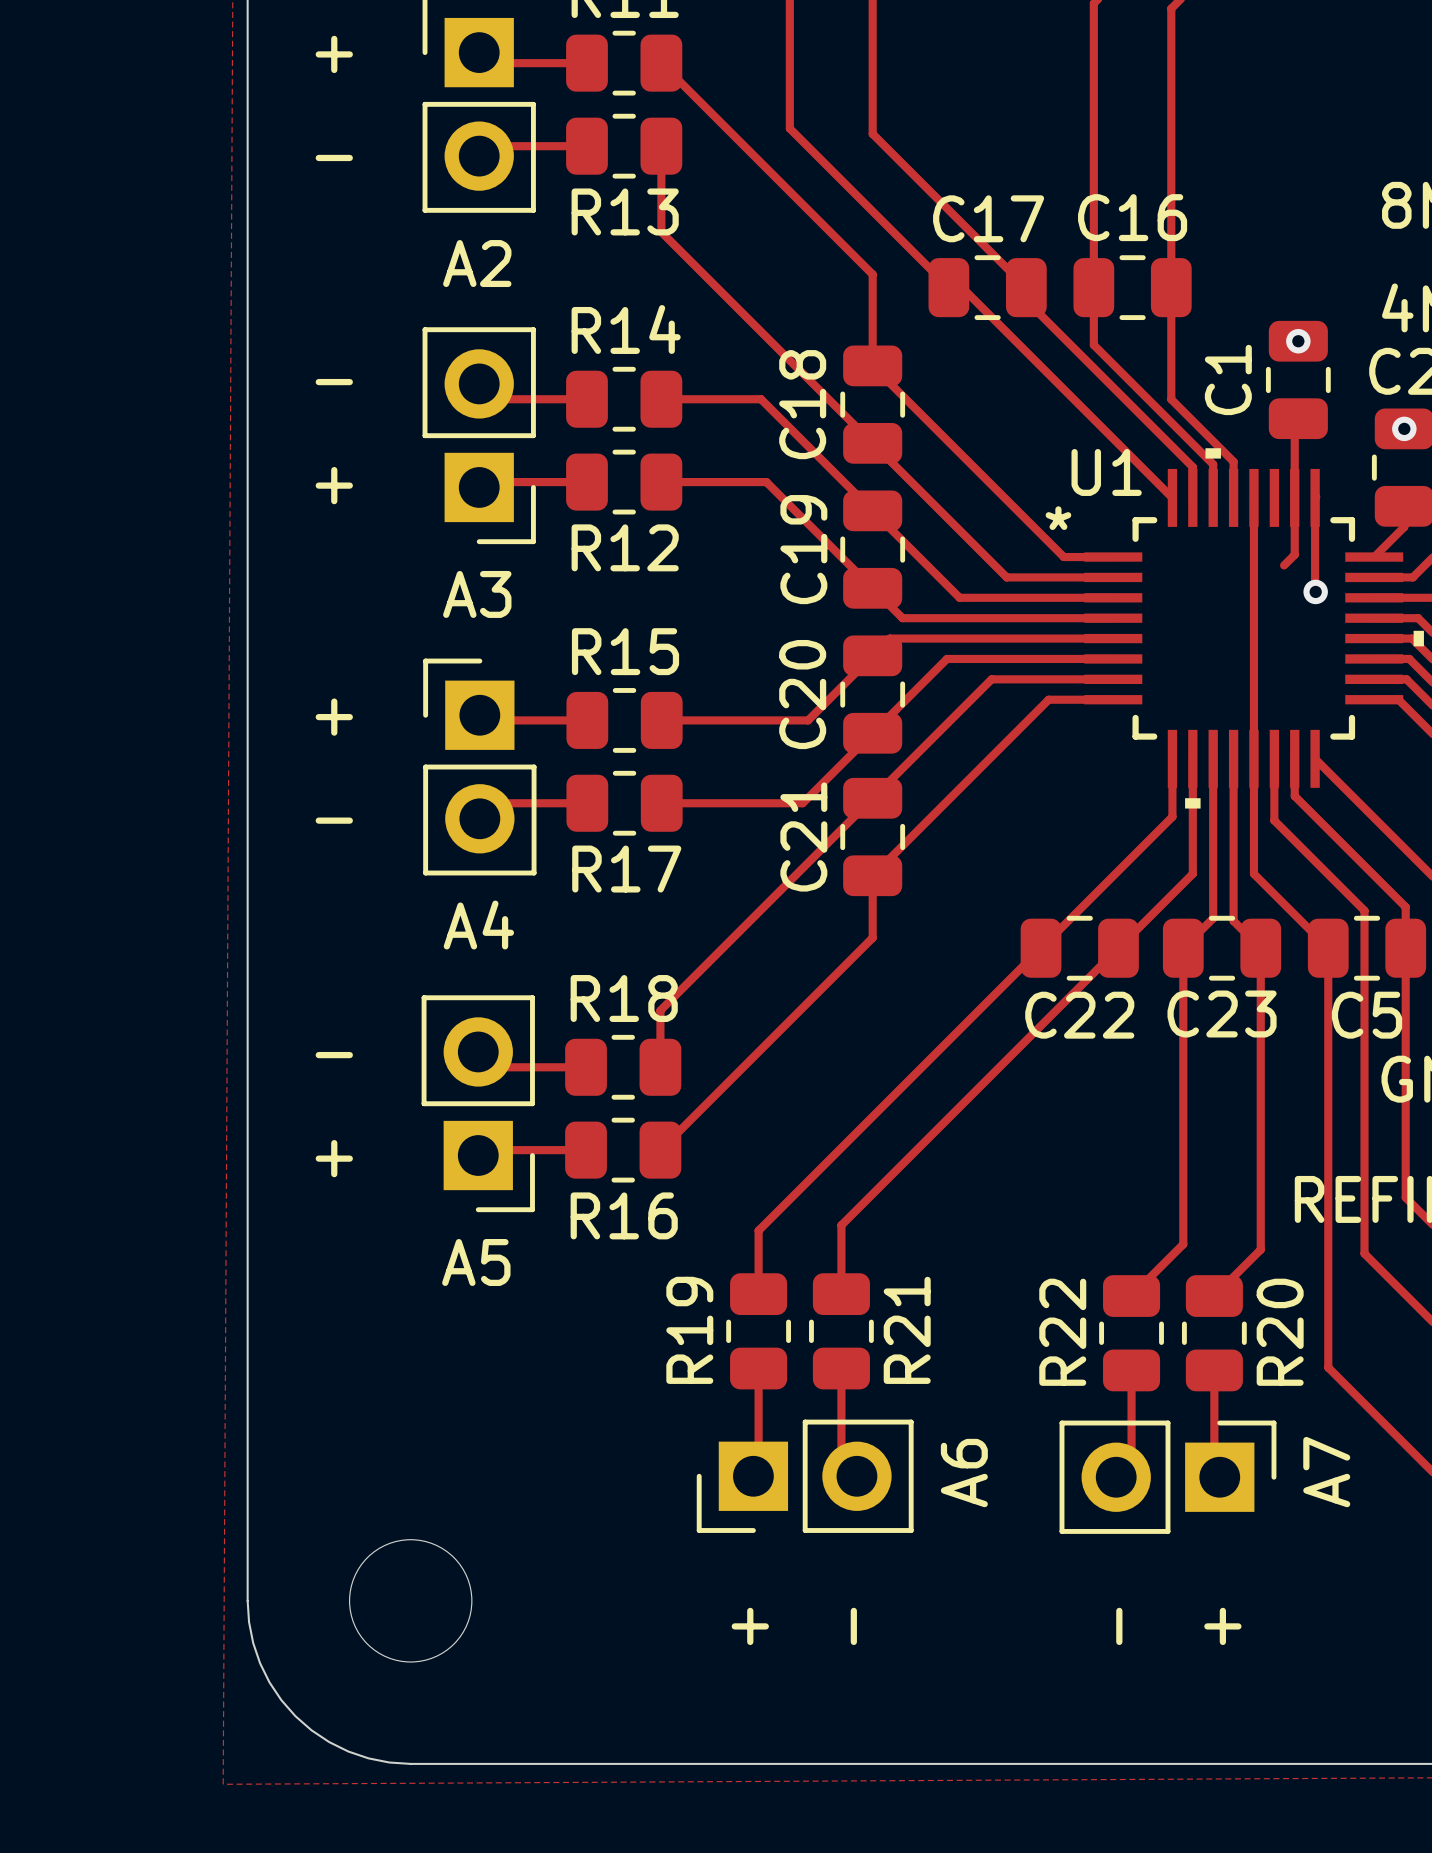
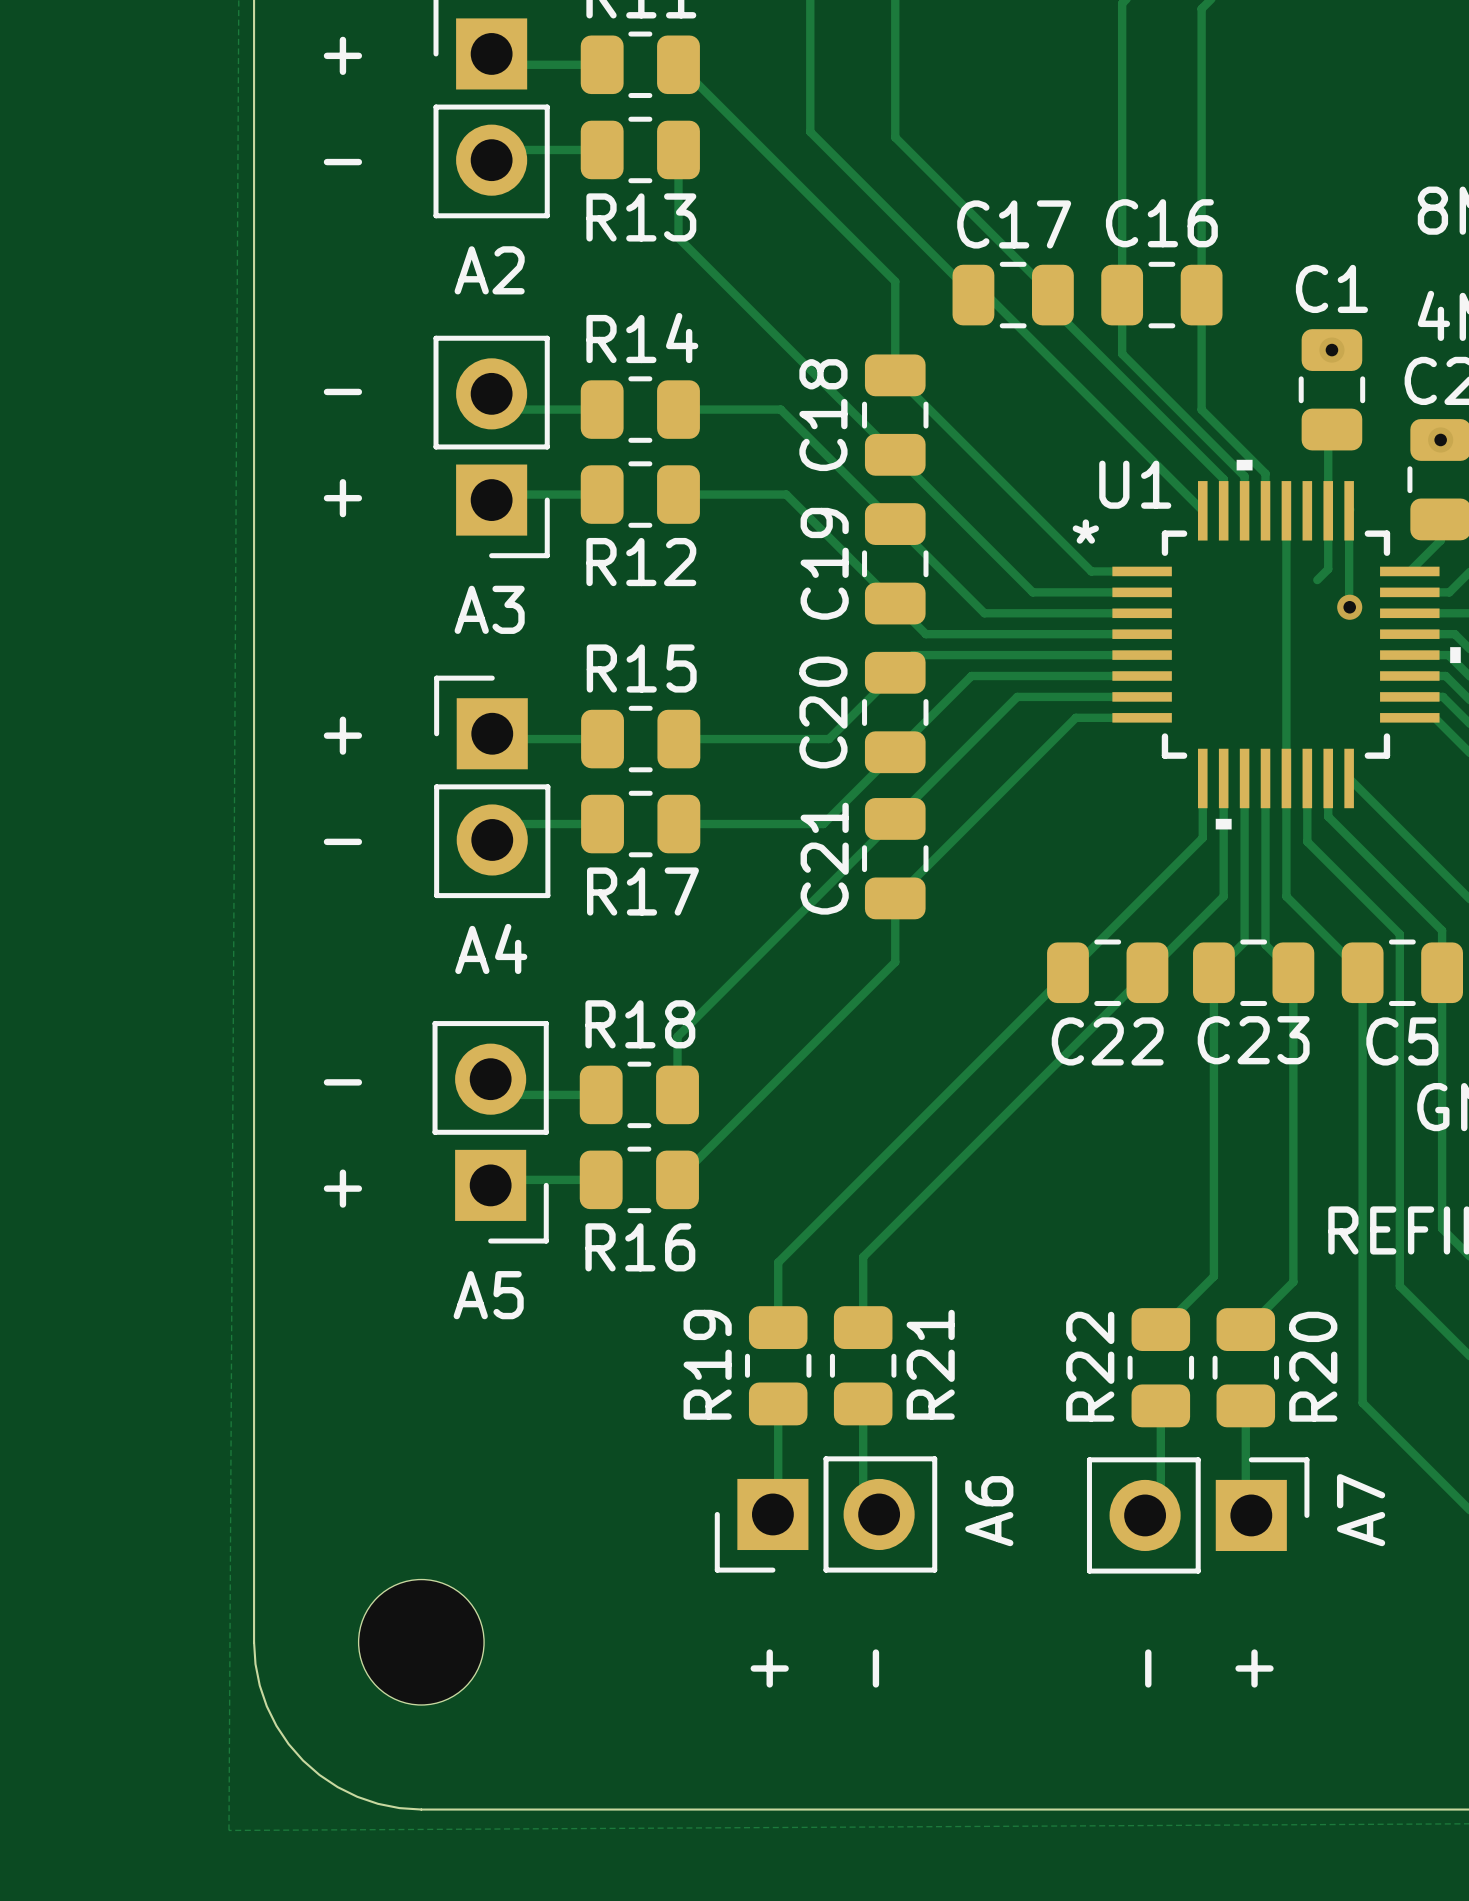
C1 name rotation: 0° (1228, 379) -> 90° clockwise (1331, 288)
C1 name position: C1 (1228, 379) -> C1 (1331, 288)

